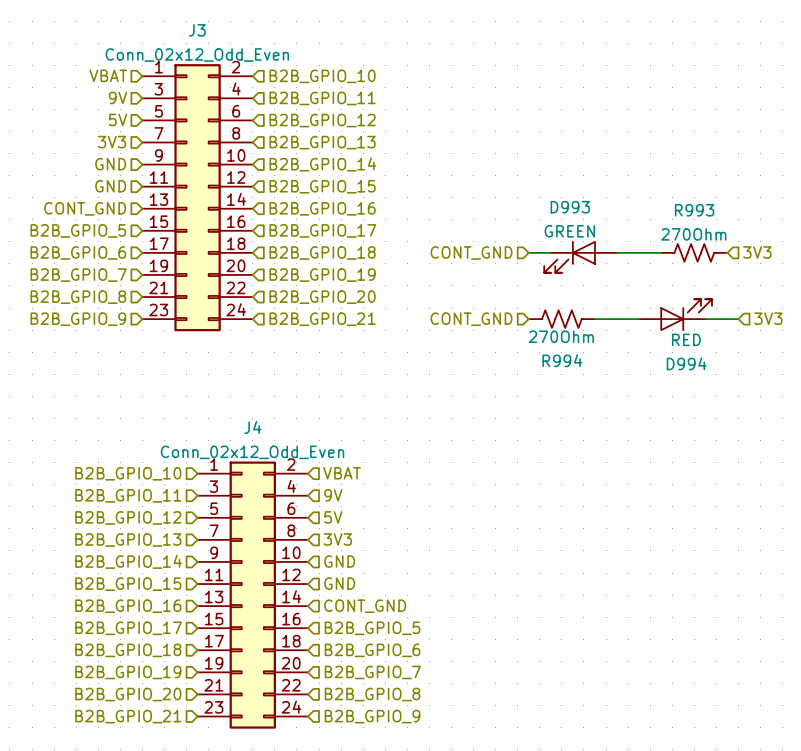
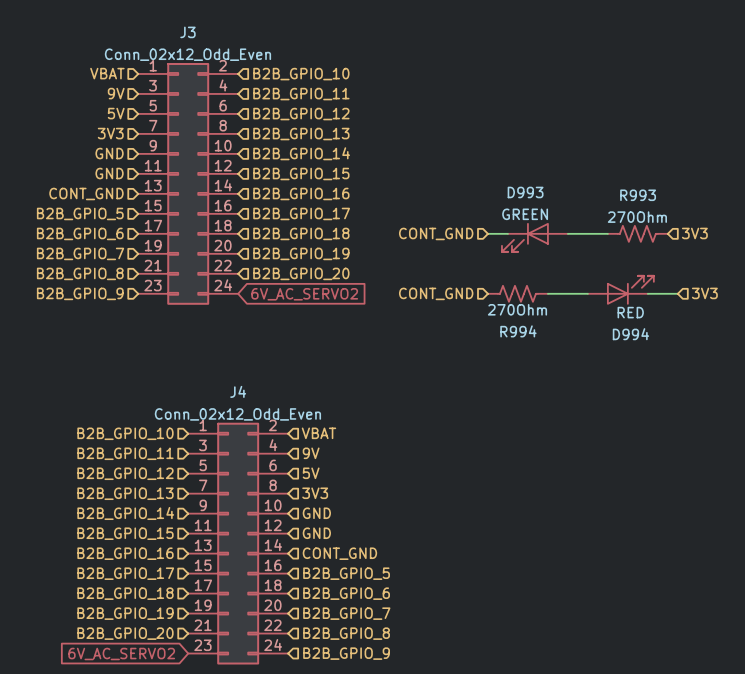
hierarchical label: B2B_GPIO_21 (322, 319) -> none
global label: none -> 6V_AC_SERVO2 (304, 294)
hierarchical label: B2B_GPIO_21 (128, 716) -> none
global label: none -> 6V_AC_SERVO2 (121, 654)

